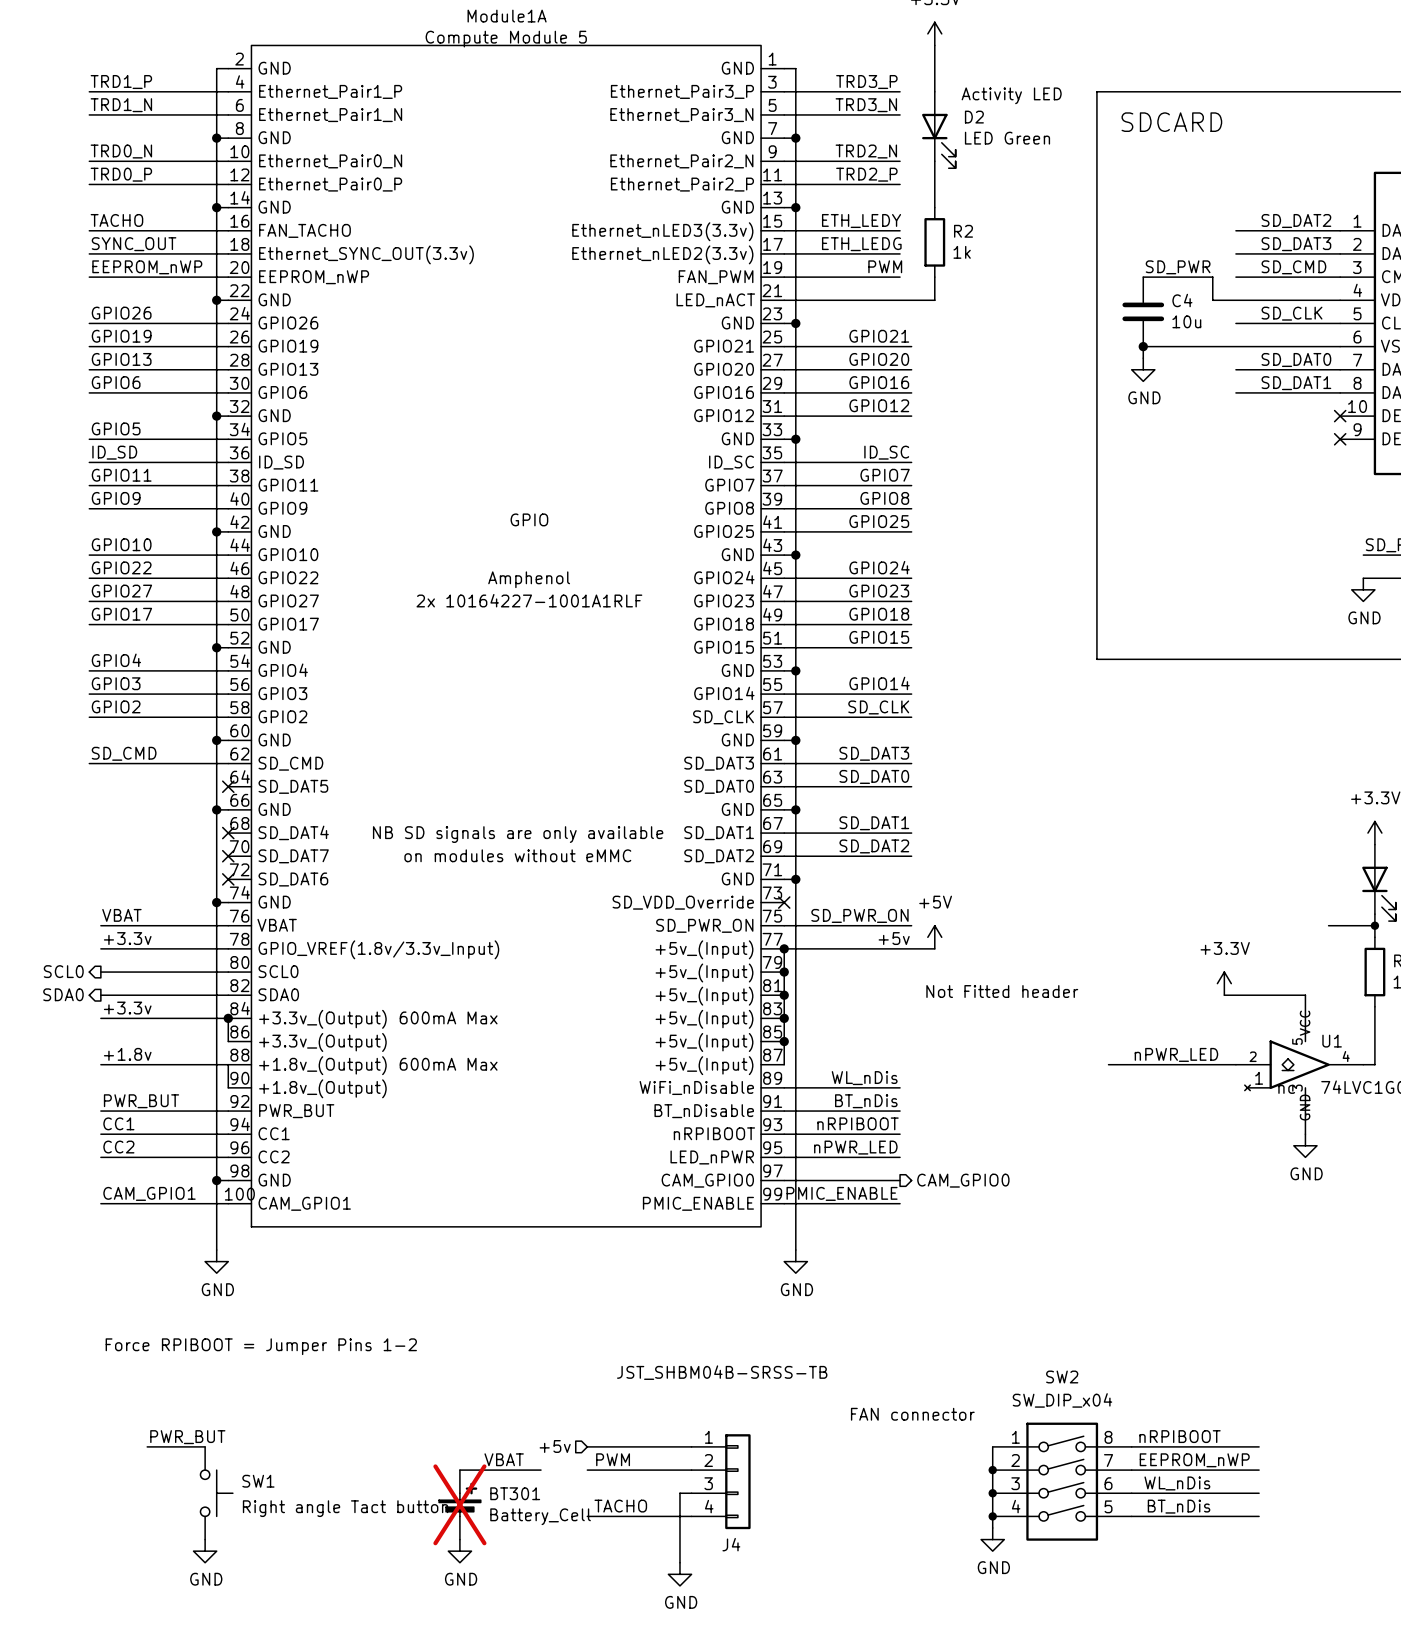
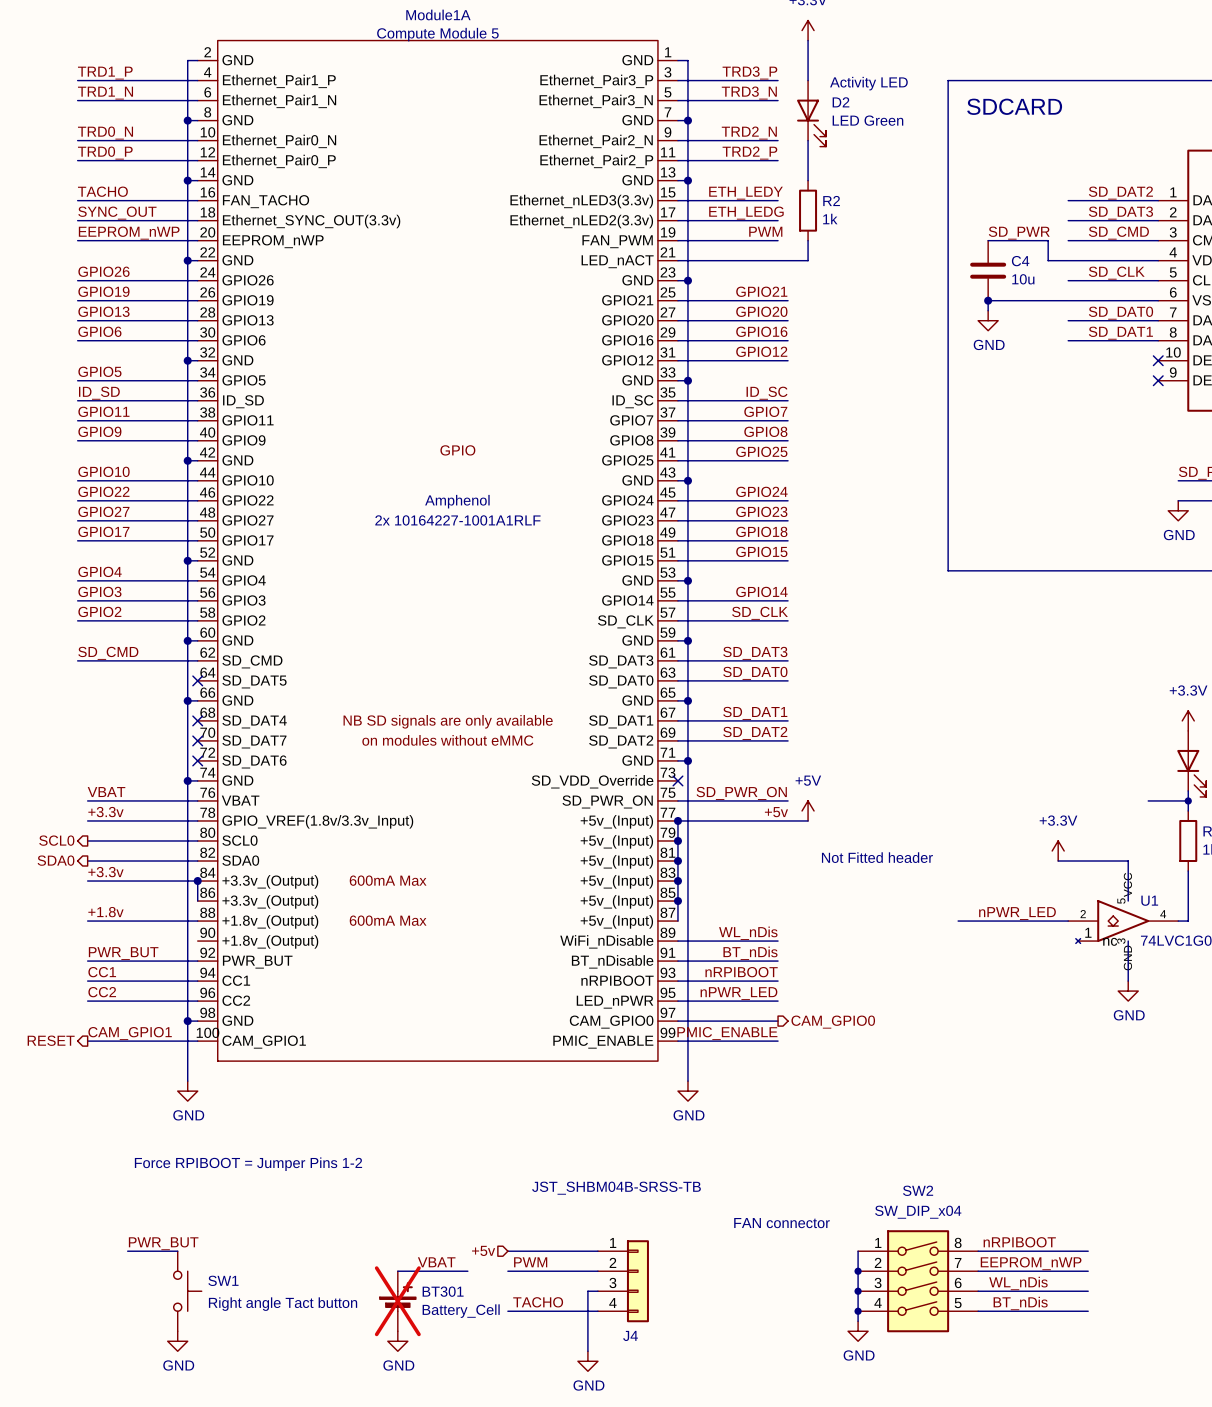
wire: (228, 1064) (228, 1087) -> none
hierarchical label: none -> RESET (51, 1040)

